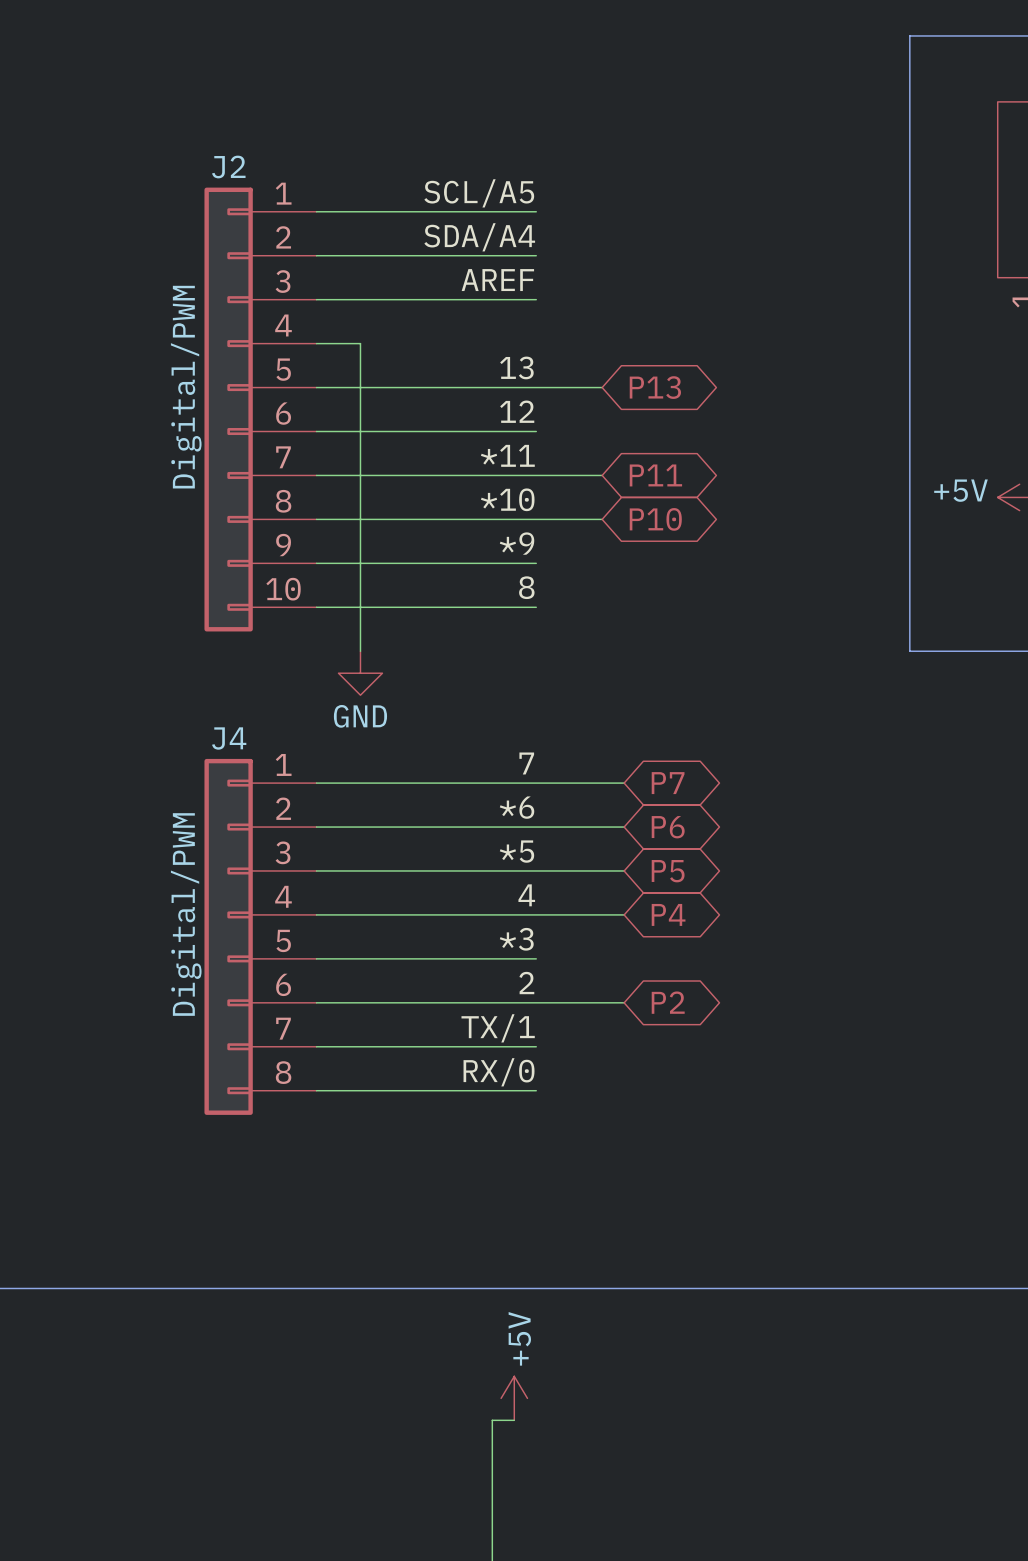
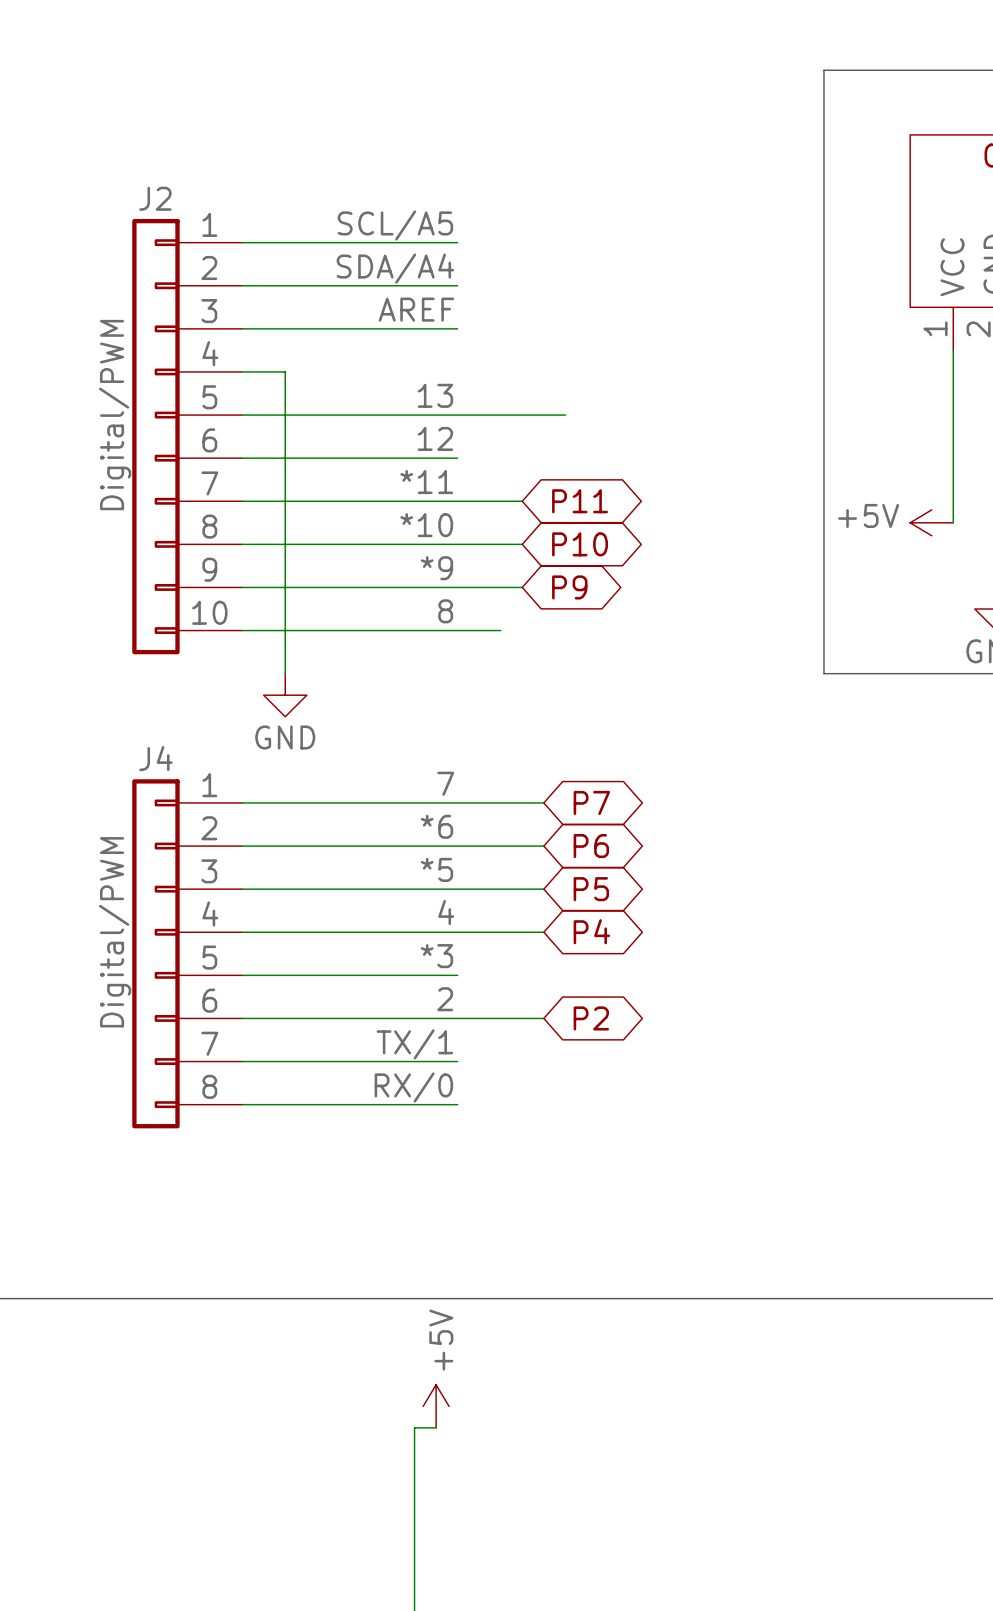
wire: none -> (522, 415) (565, 415)
global label: P13 (655, 387) -> none
wire: none -> (457, 587) (522, 587)
global label: none -> P9 (569, 587)
wire: none -> (457, 630) (500, 630)

